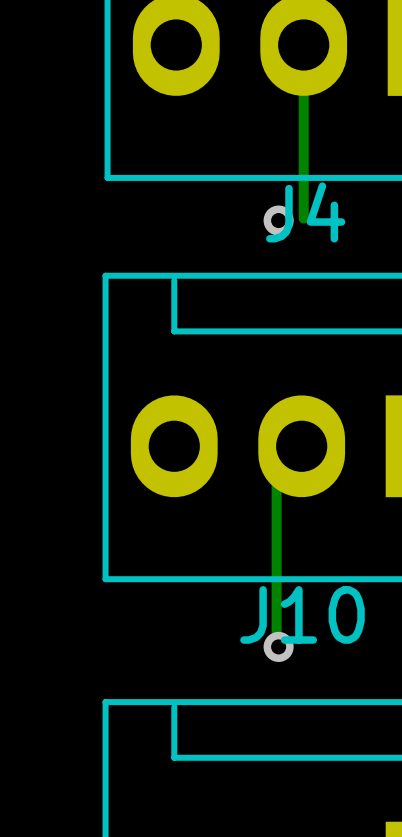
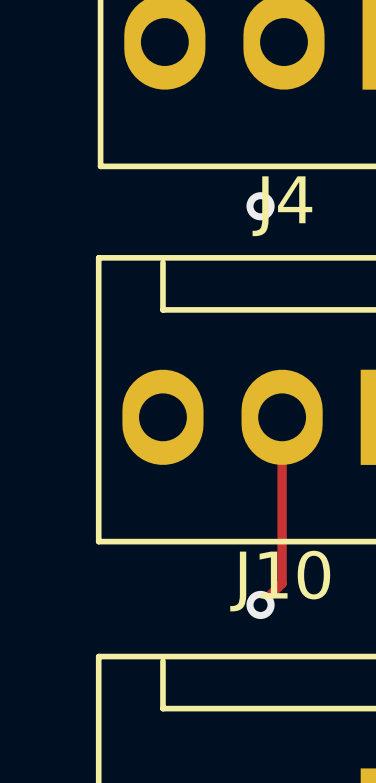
bottom track: (303, 44) (303, 218) -> none
bottom track: (276, 446) (276, 644) -> none
top track: none -> (282, 417) (282, 583) (260, 604)

